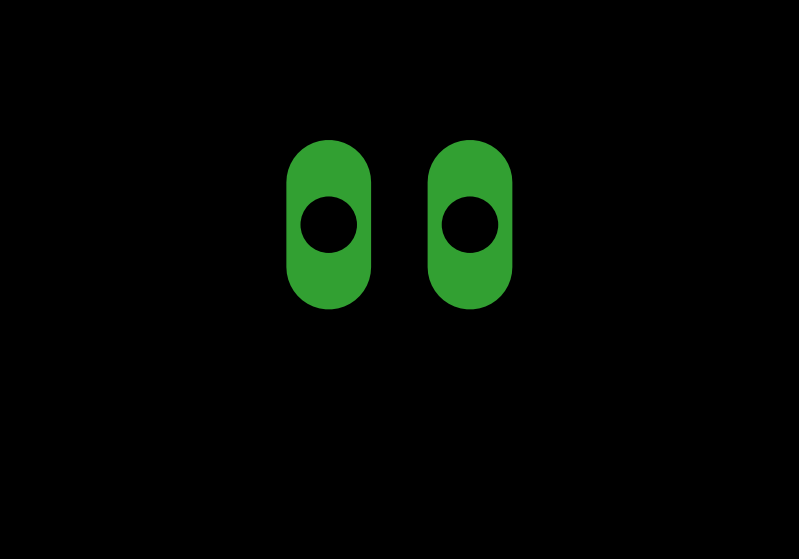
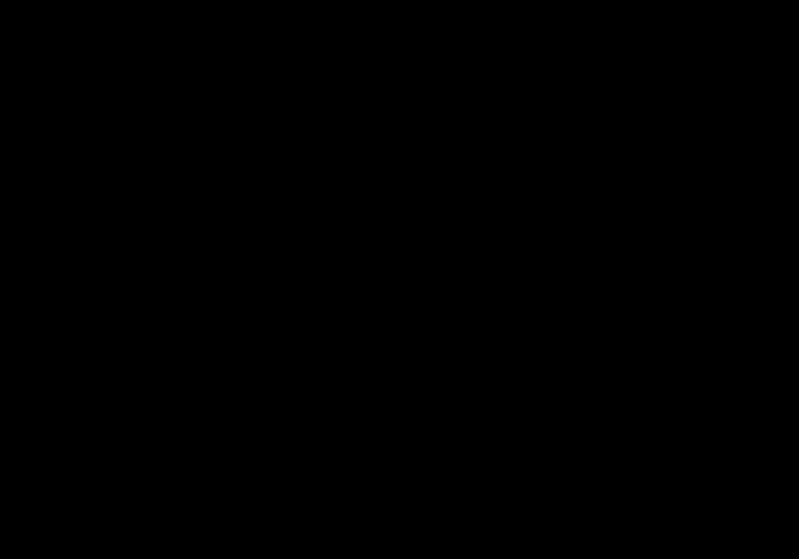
part: (399, 224) -> none

